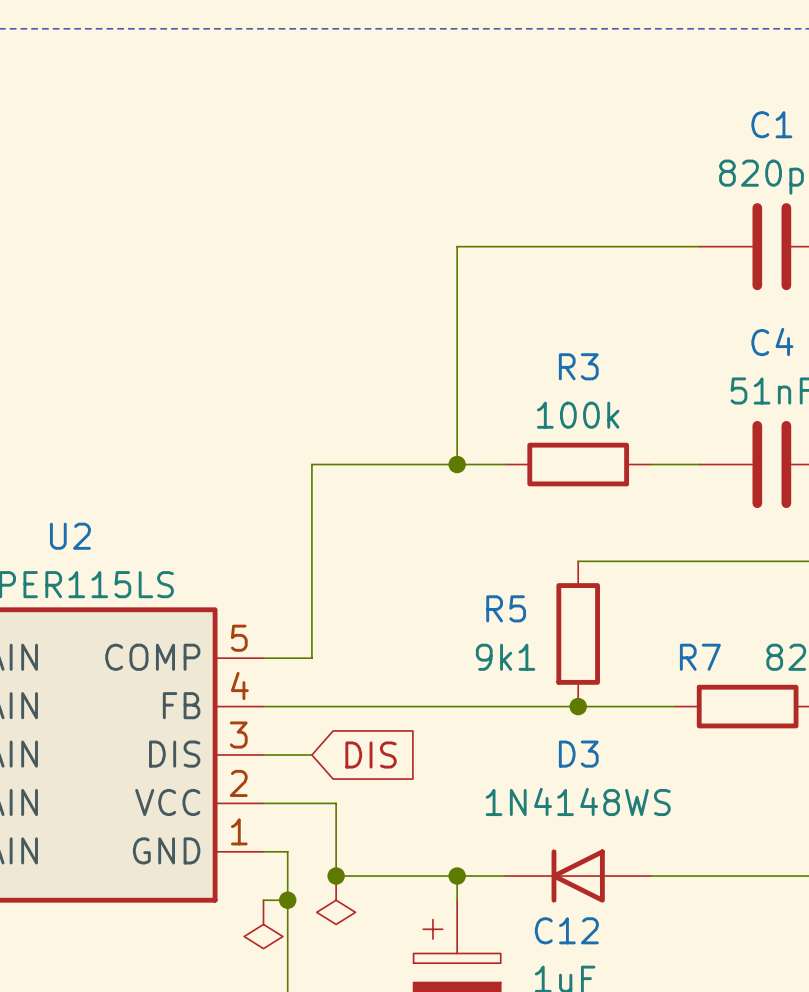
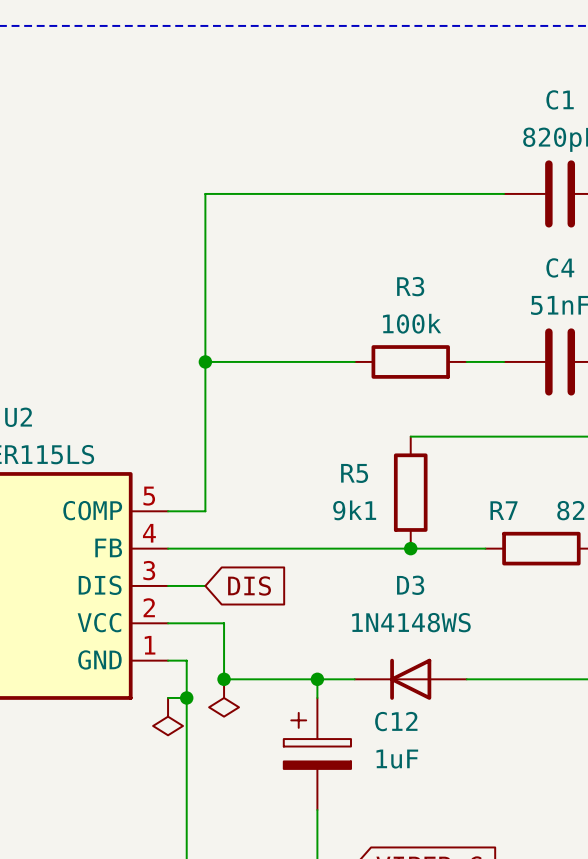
wire: (457, 246) (457, 464) -> (317, 193) (205, 193) (205, 361)
junction: none -> (205, 361)
junction: (457, 464) -> none

